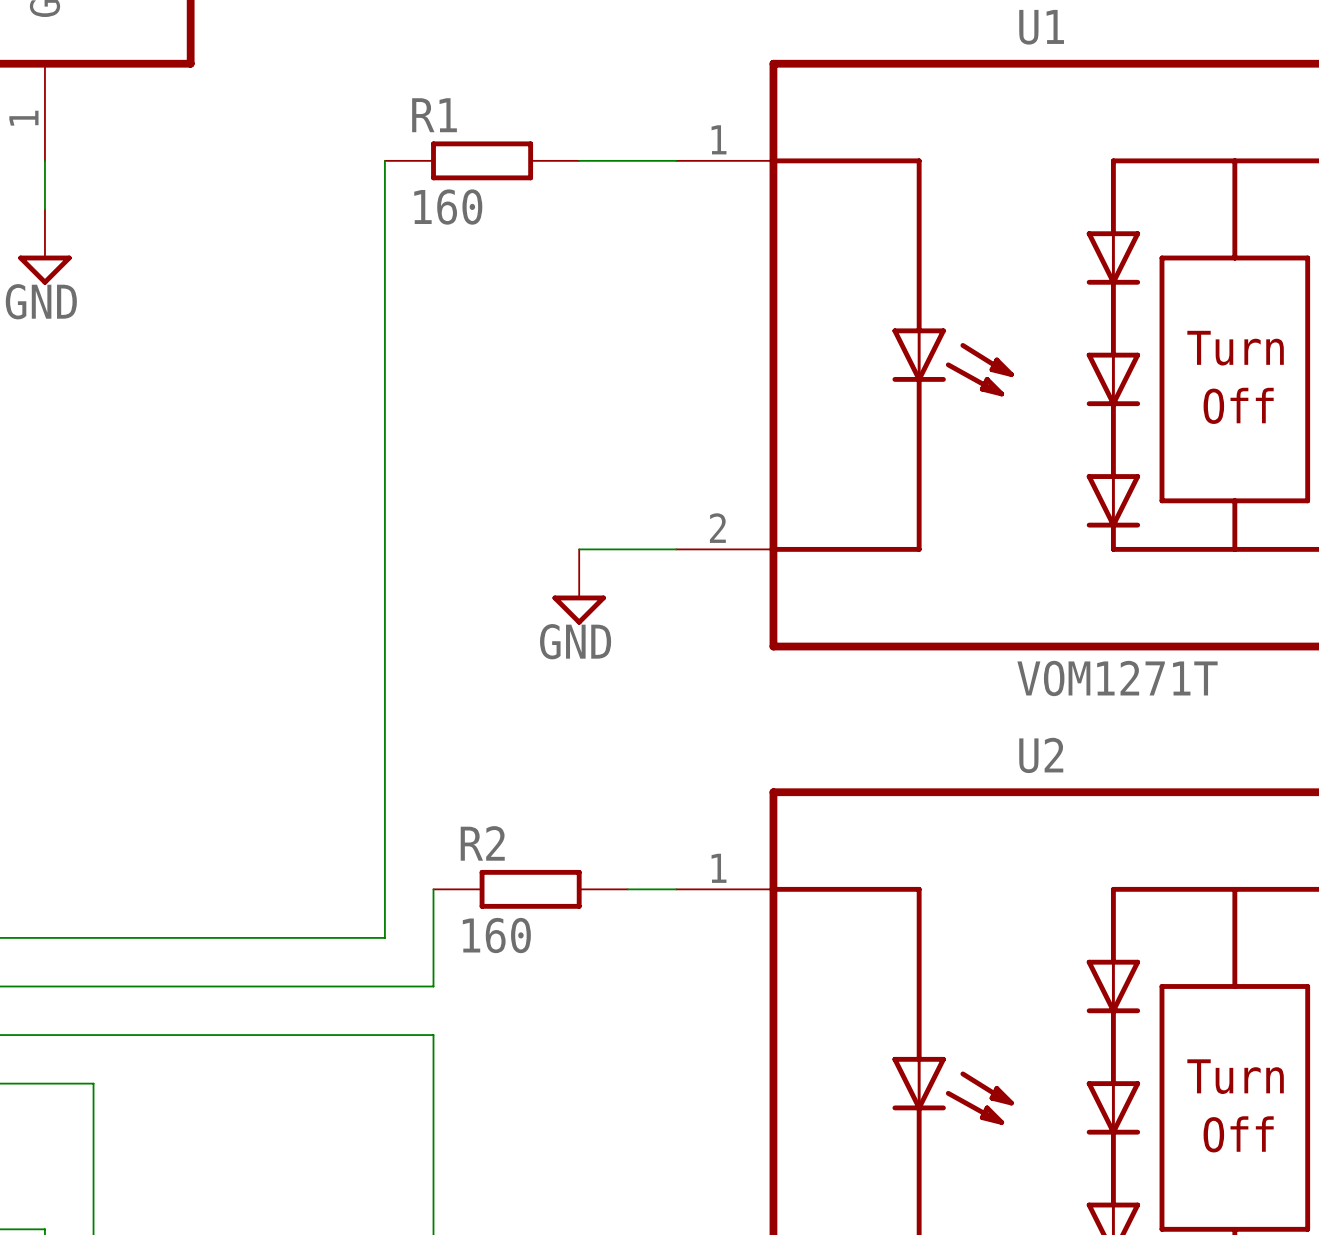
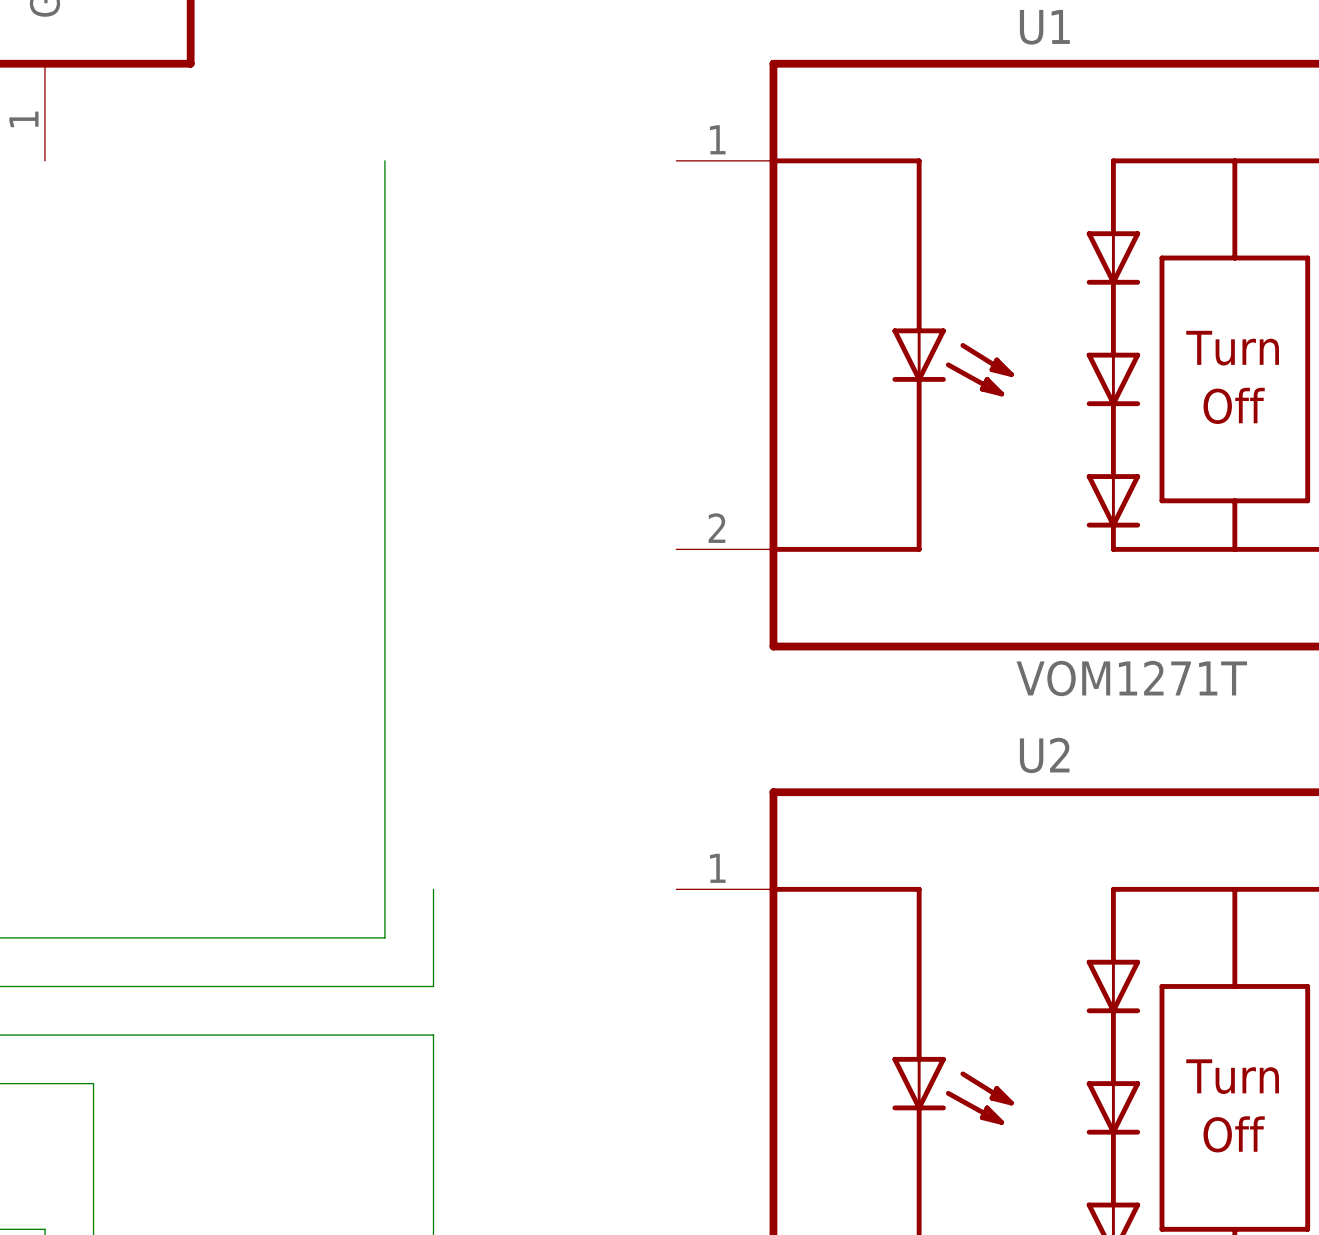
wire: (44, 160) (44, 209) -> none
R1: 160 (482, 160) -> none
wire: (579, 160) (676, 160) -> none
power symbol: GND (44, 247) -> none
wire: (579, 549) (676, 549) -> none
power symbol: GND (579, 587) -> none
R2: 160 (530, 889) -> none
wire: (627, 889) (676, 889) -> none

